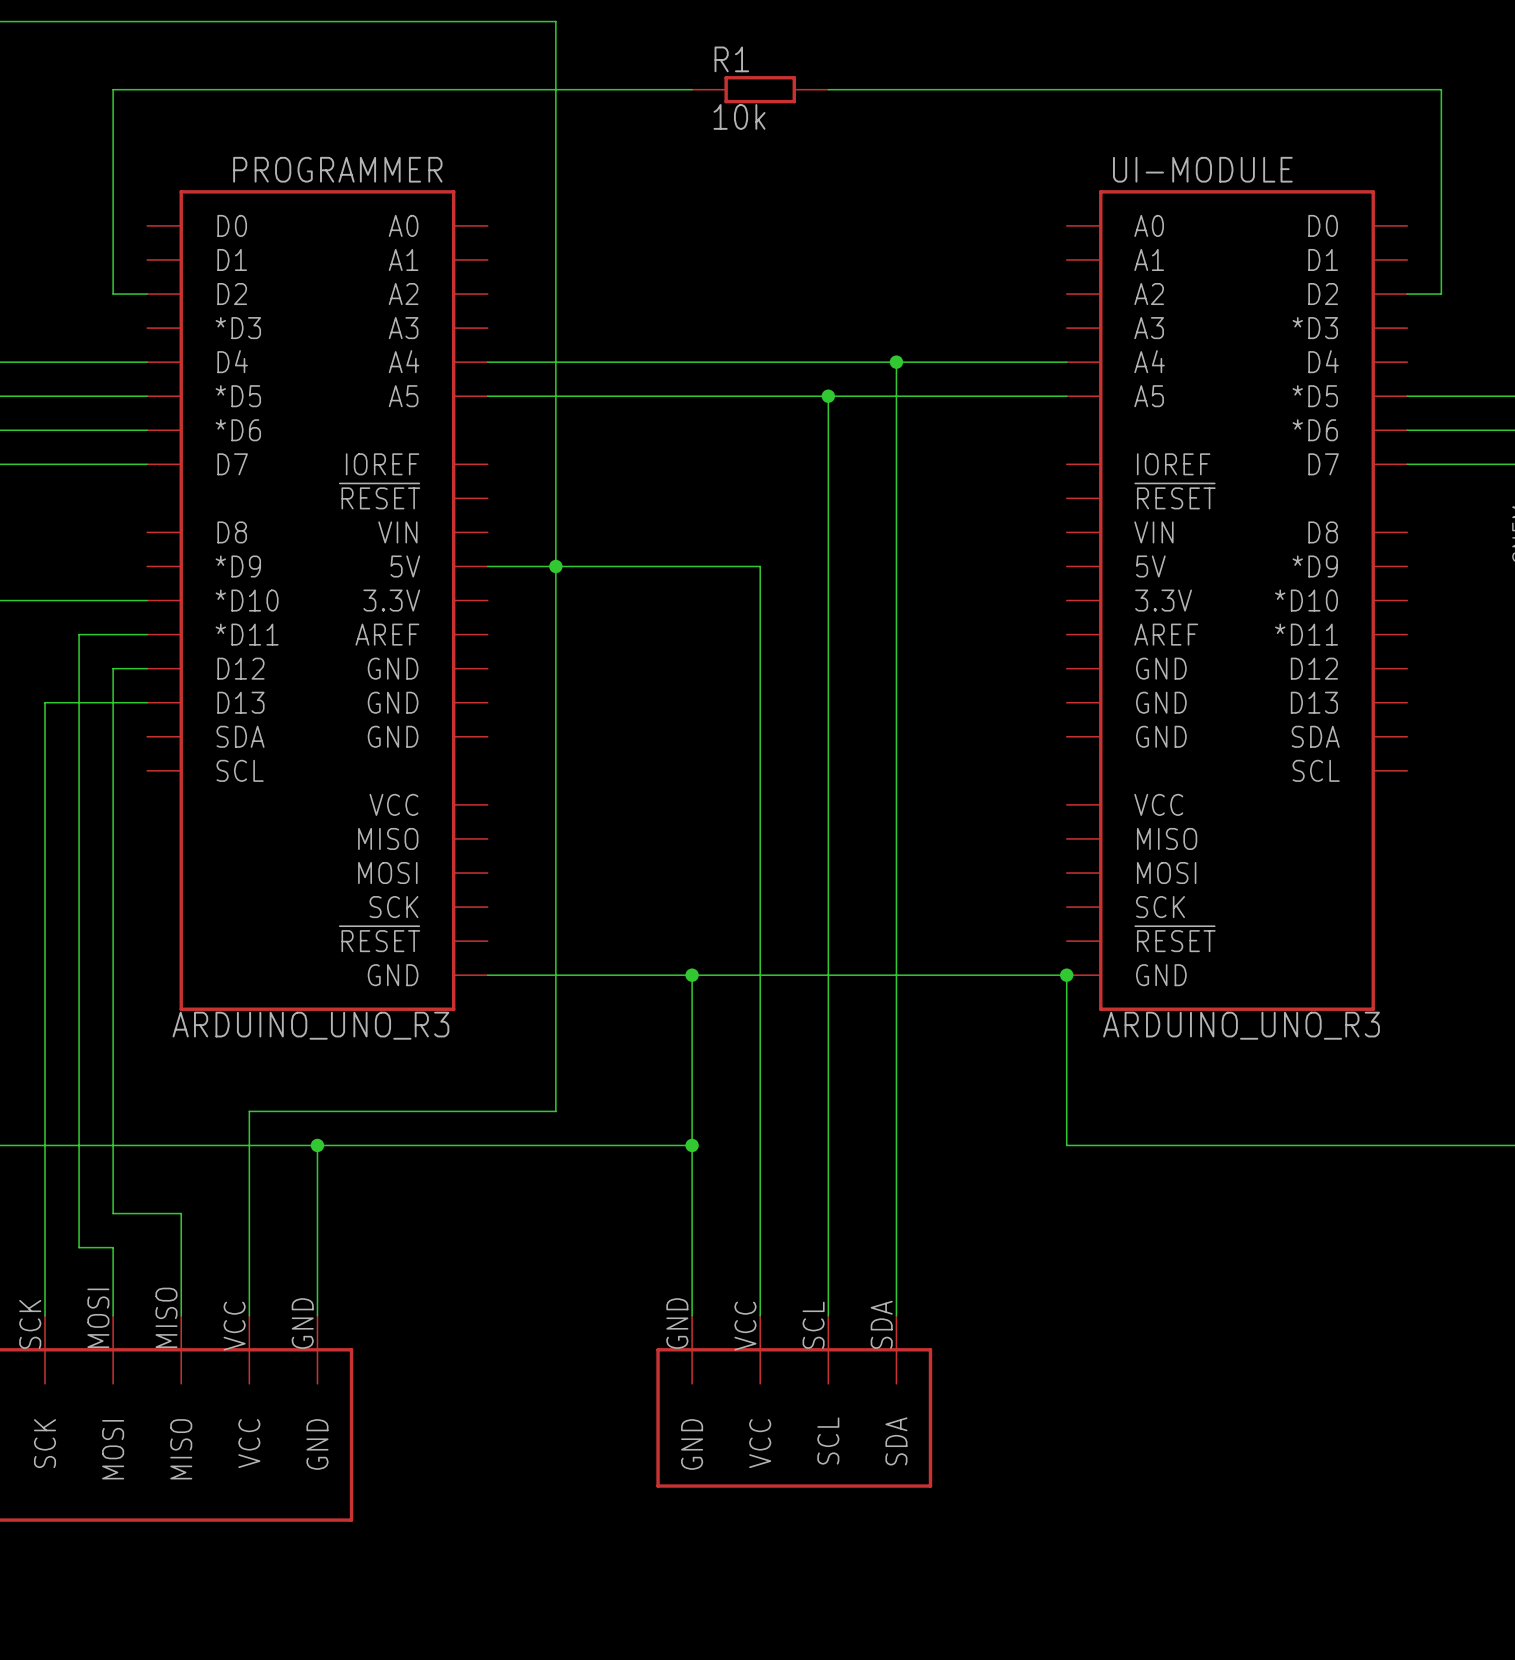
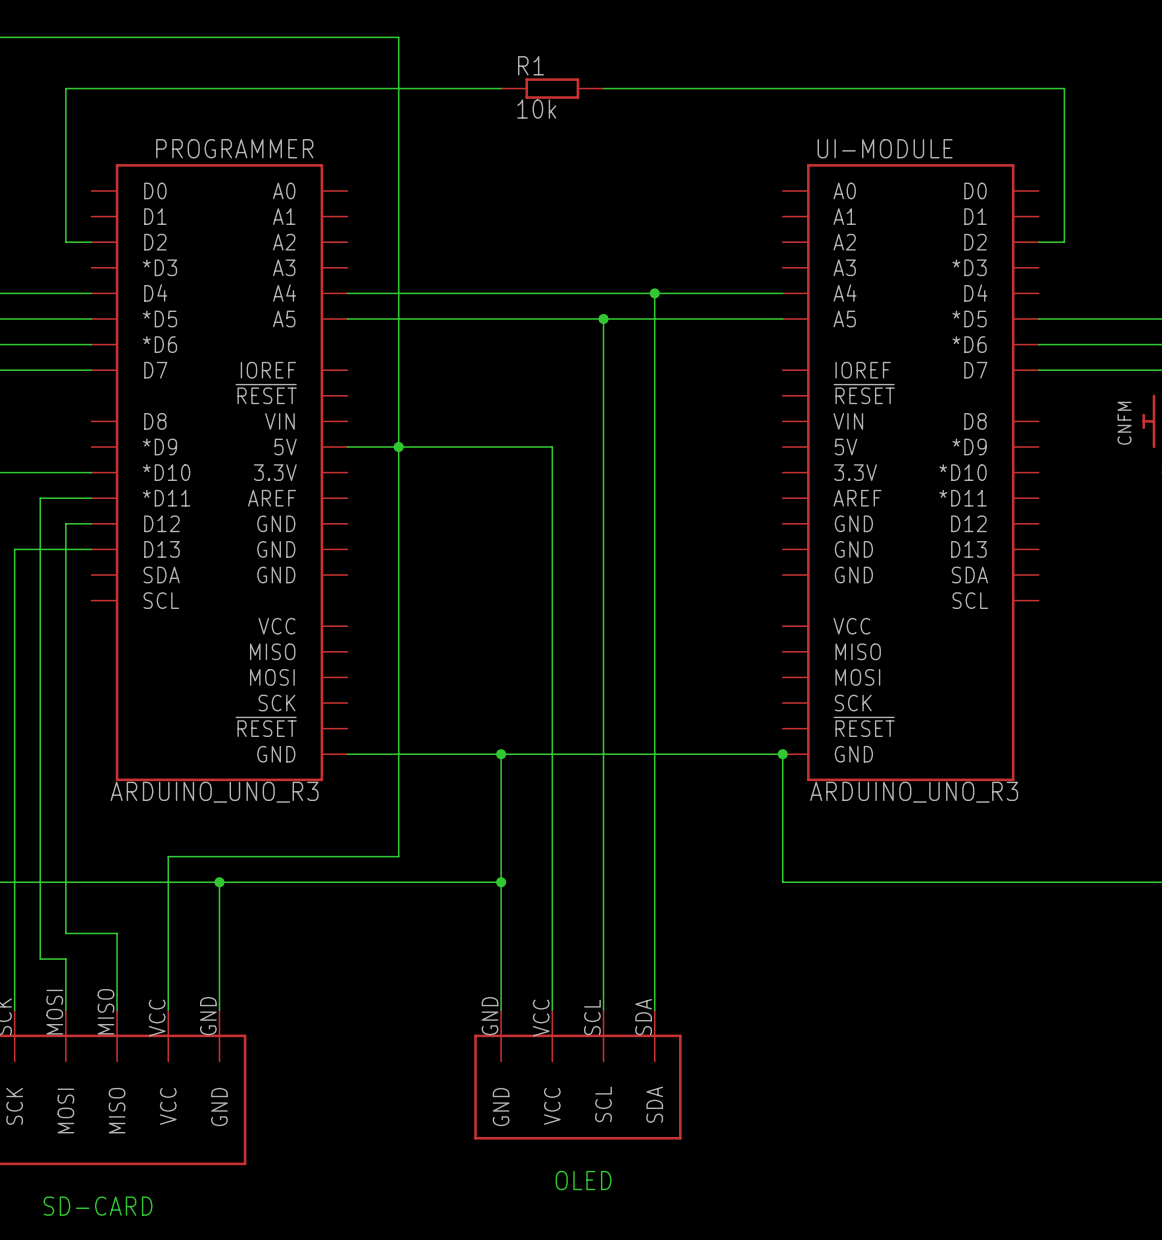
text: none -> OLED (583, 1180)
text: none -> SD-CARD (98, 1206)

